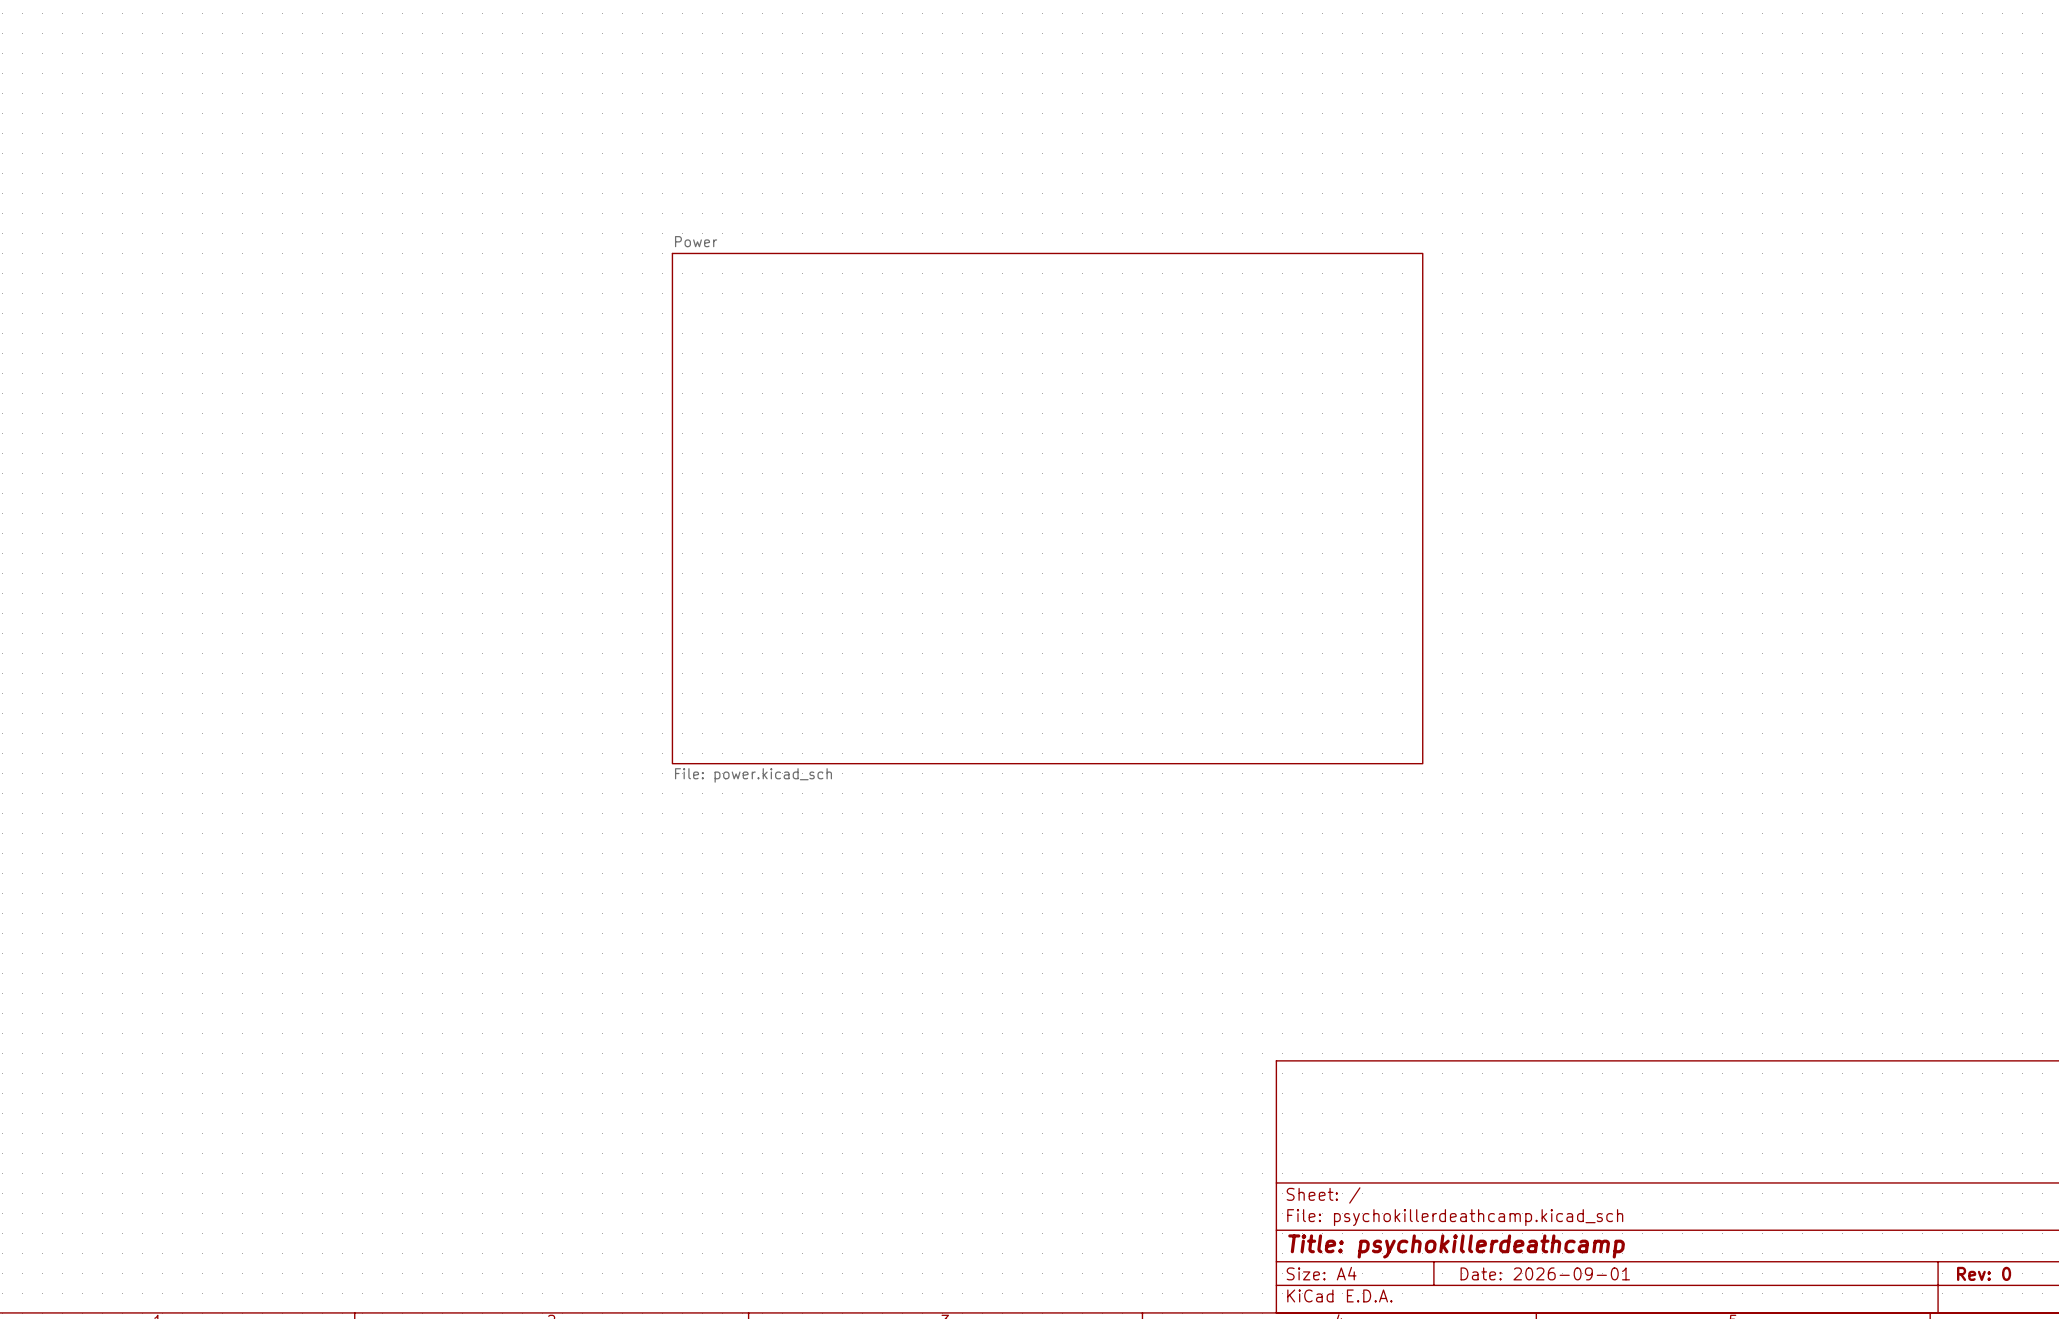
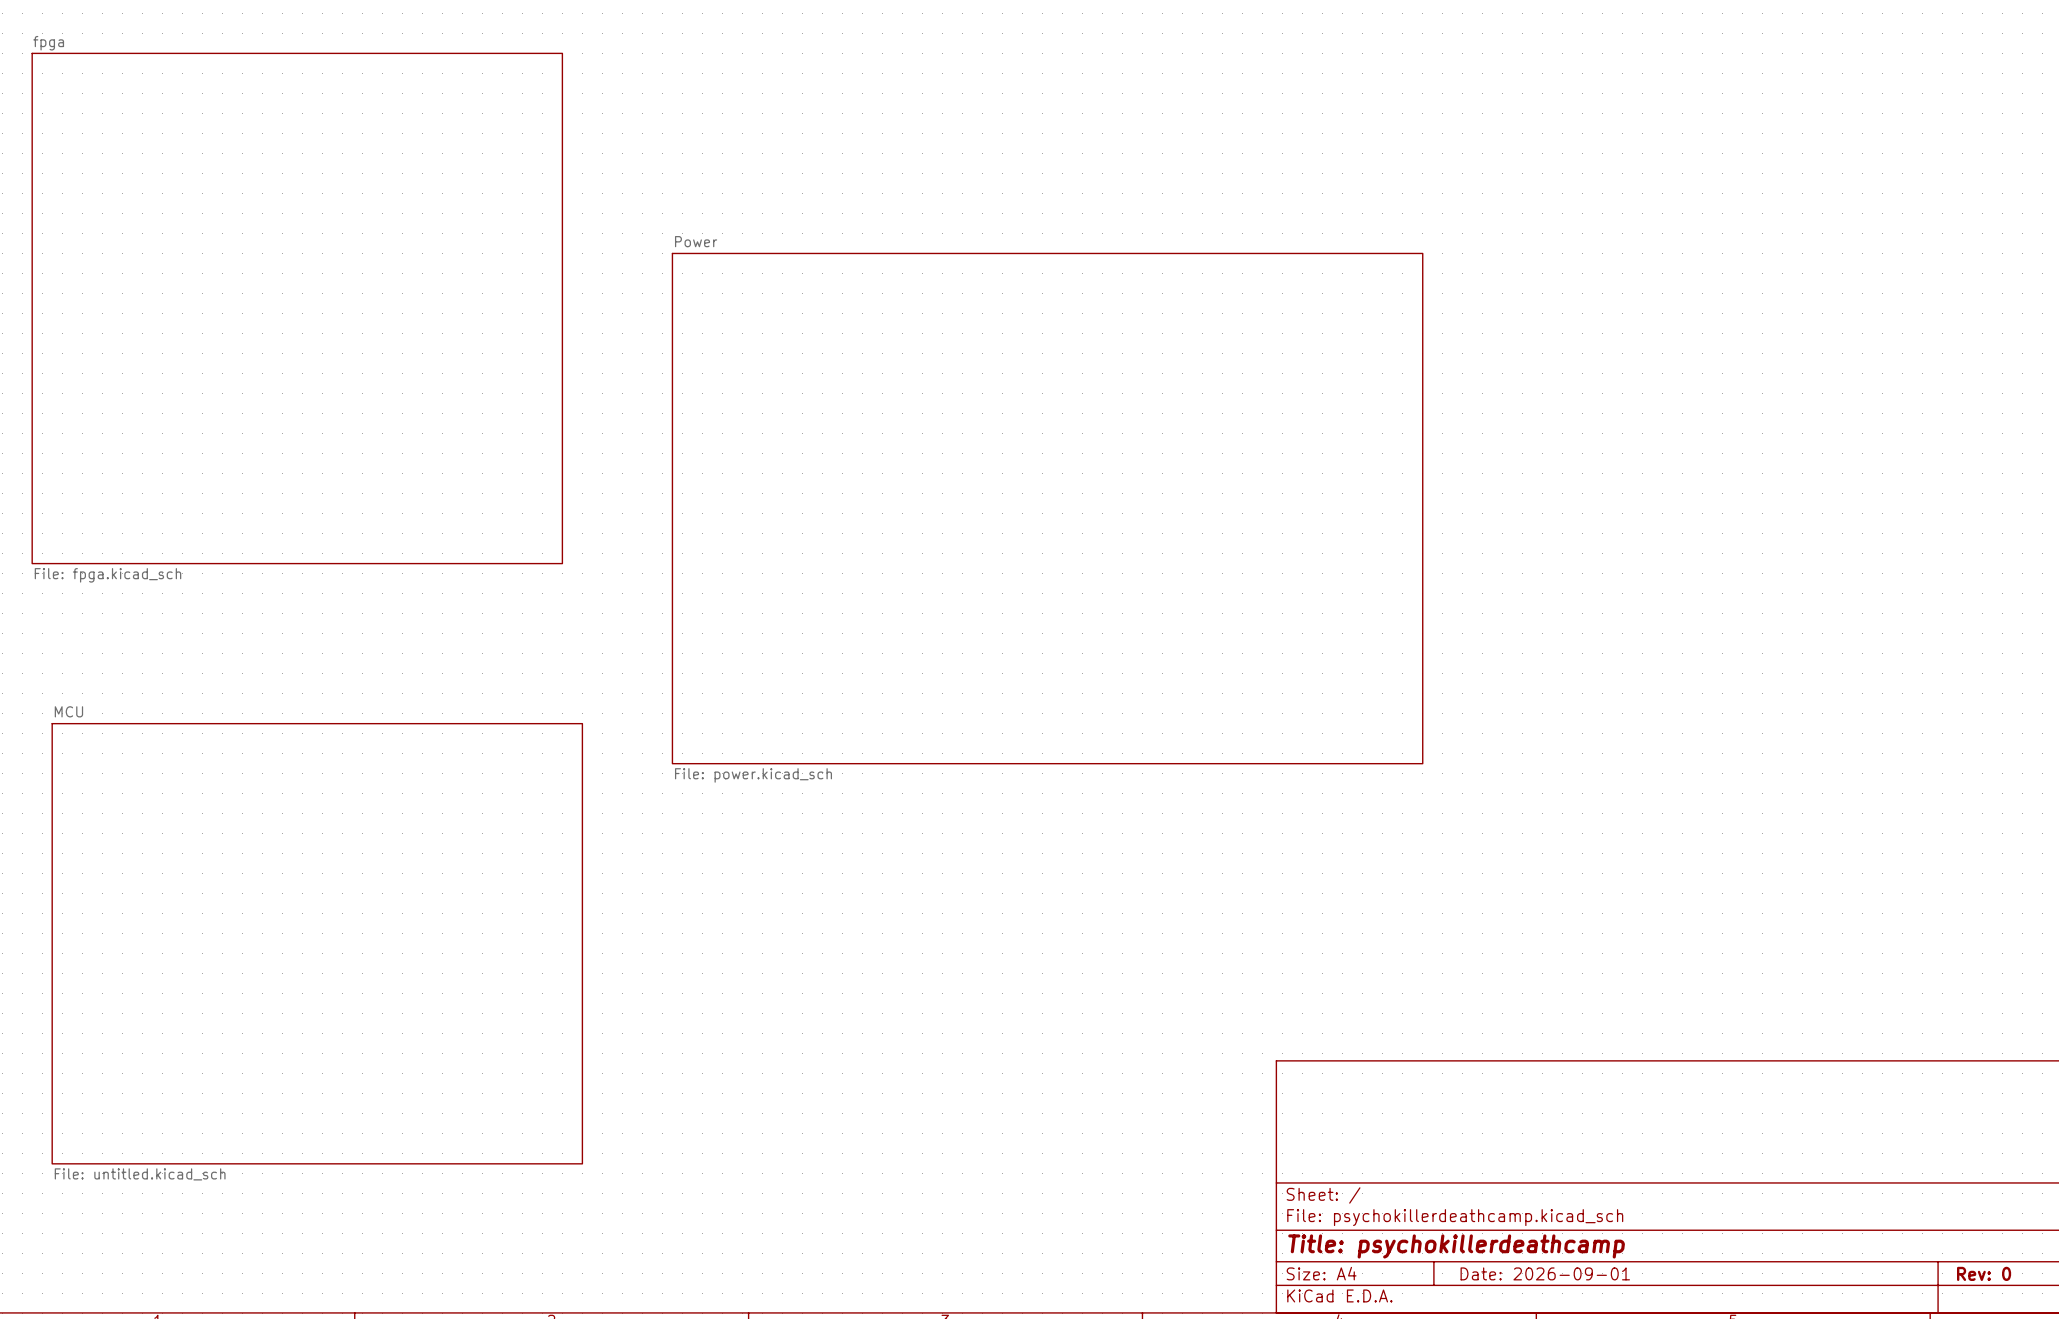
sheet fpga: none -> File: fpga.kicad_sch (297, 308)
sheet MCU: none -> File: untitled.kicad_sch (317, 943)

